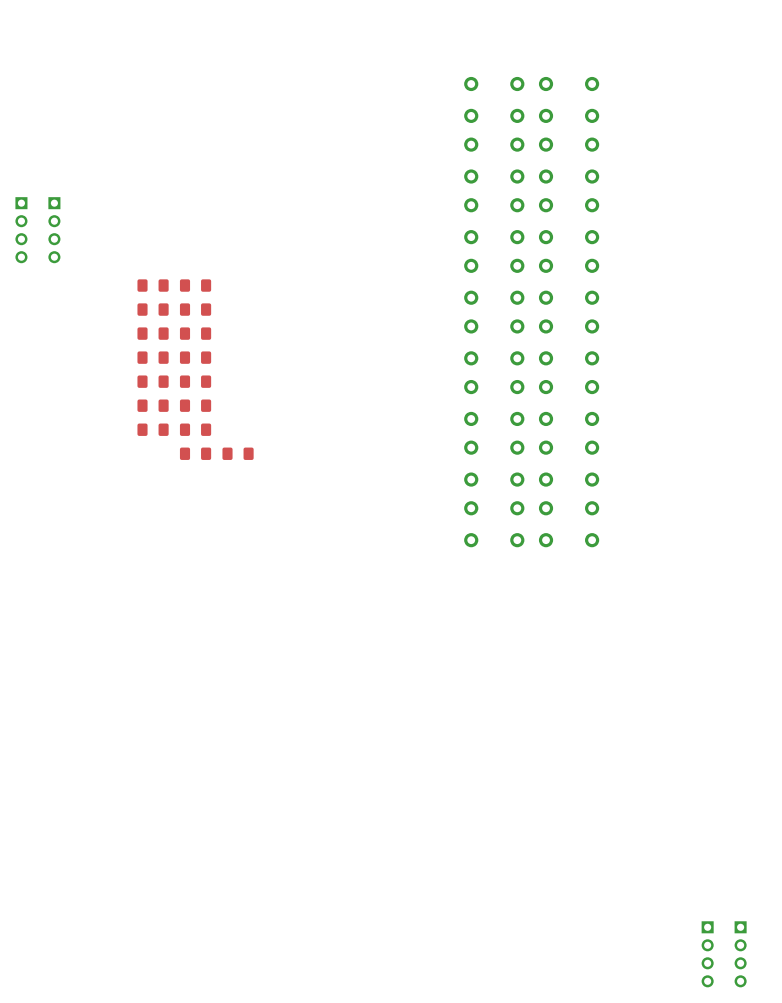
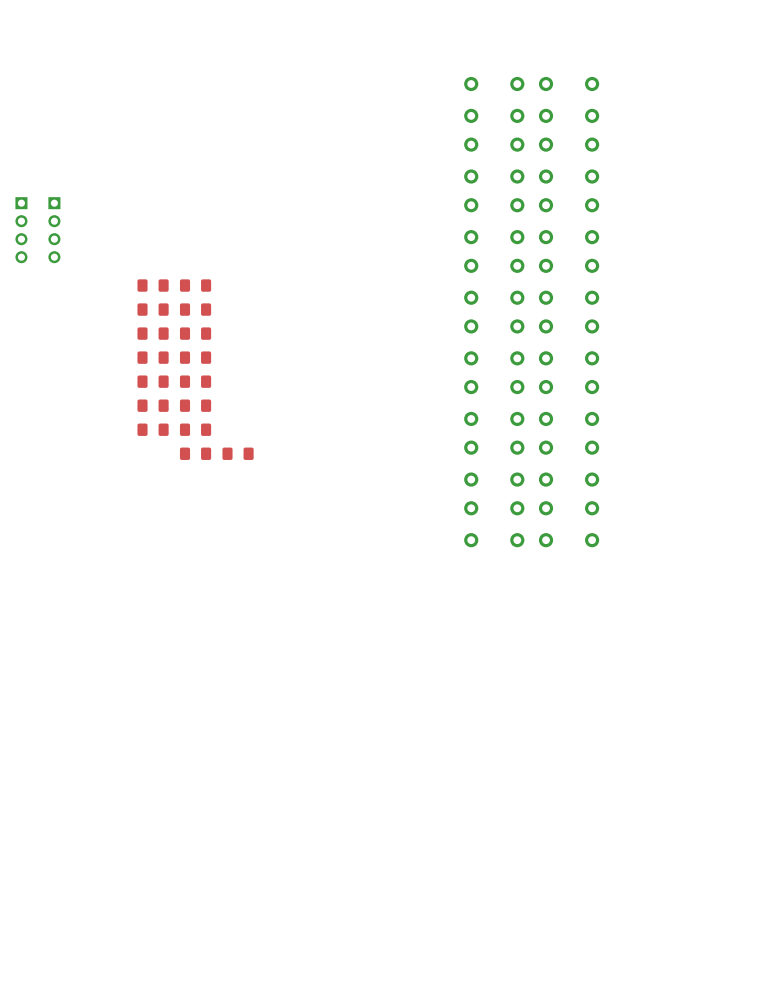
part: (707, 954) -> none
part: (740, 954) -> none

